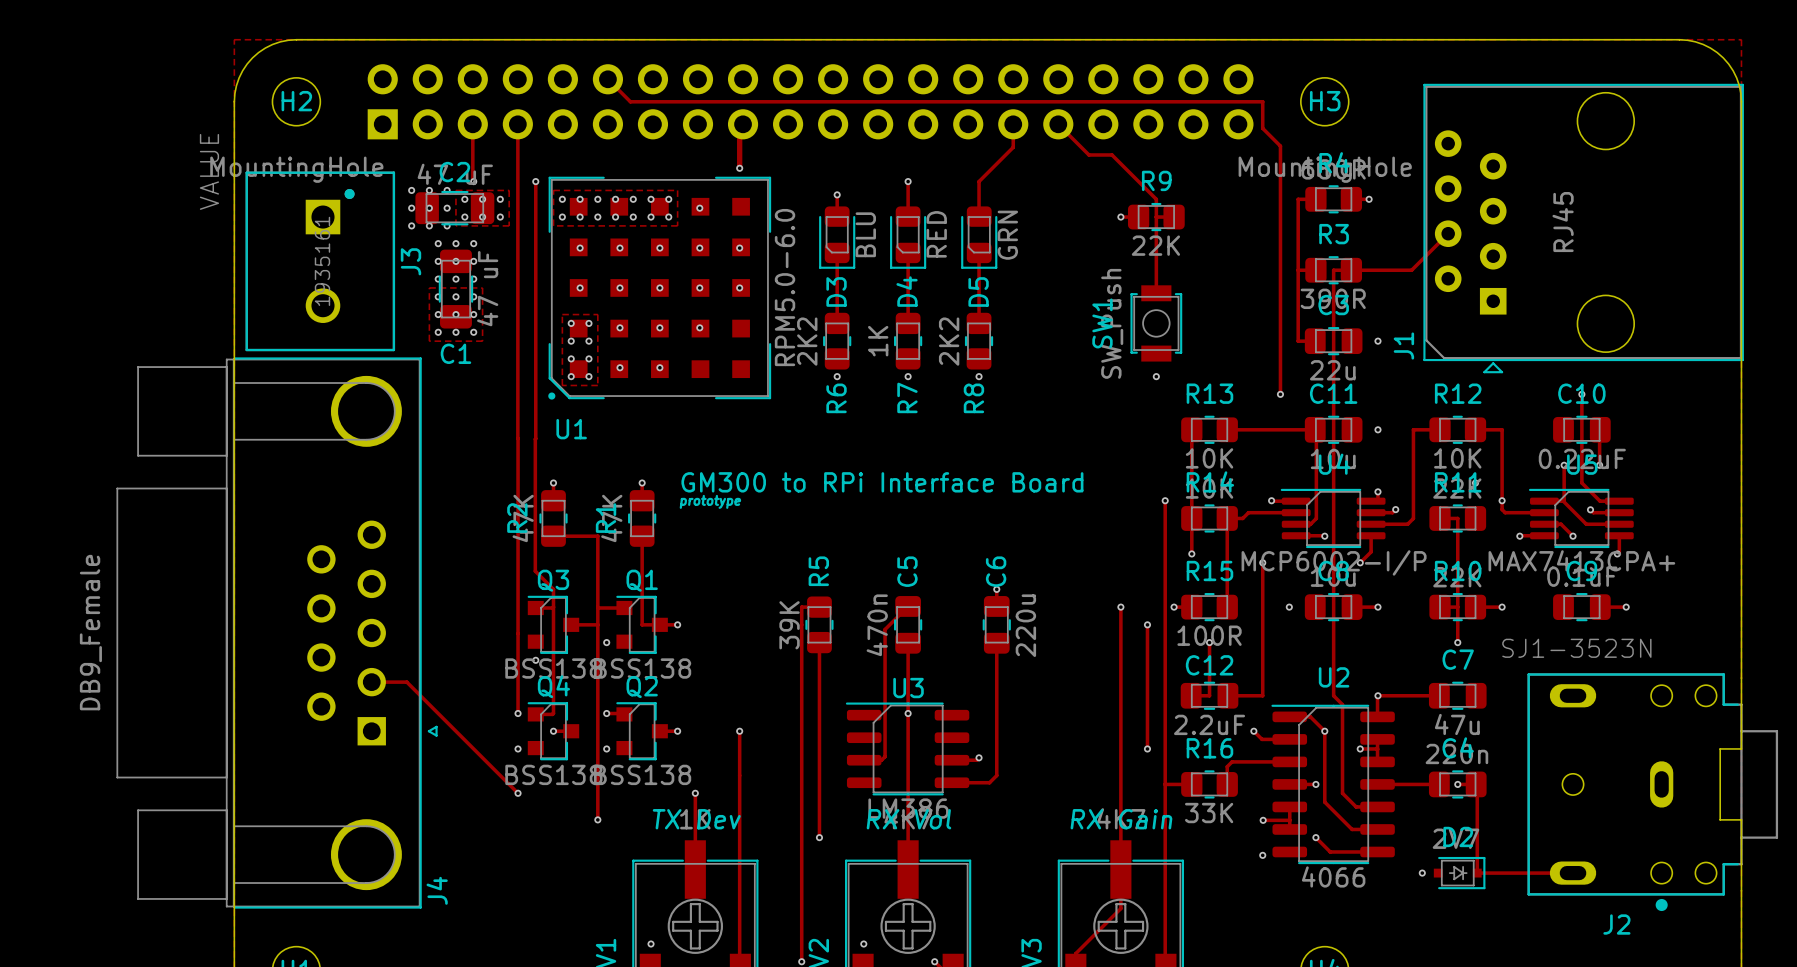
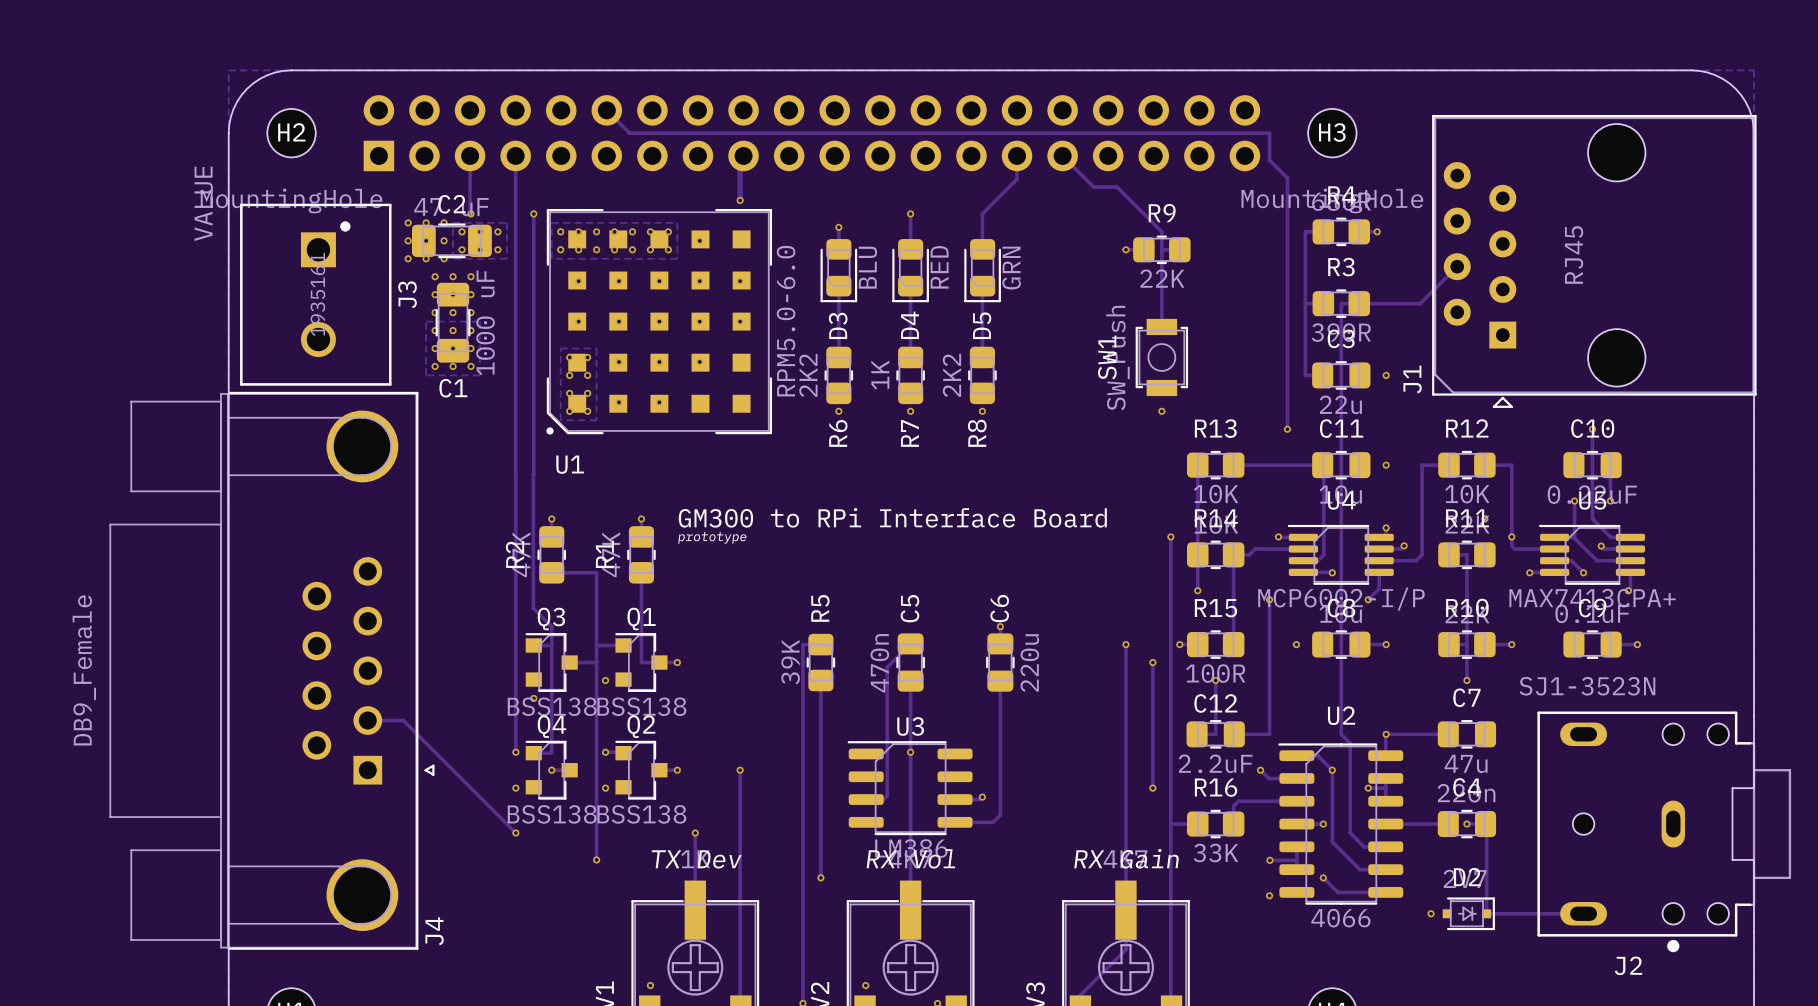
C1 value: 47 uF (487, 288) -> 1000 uF (485, 322)

